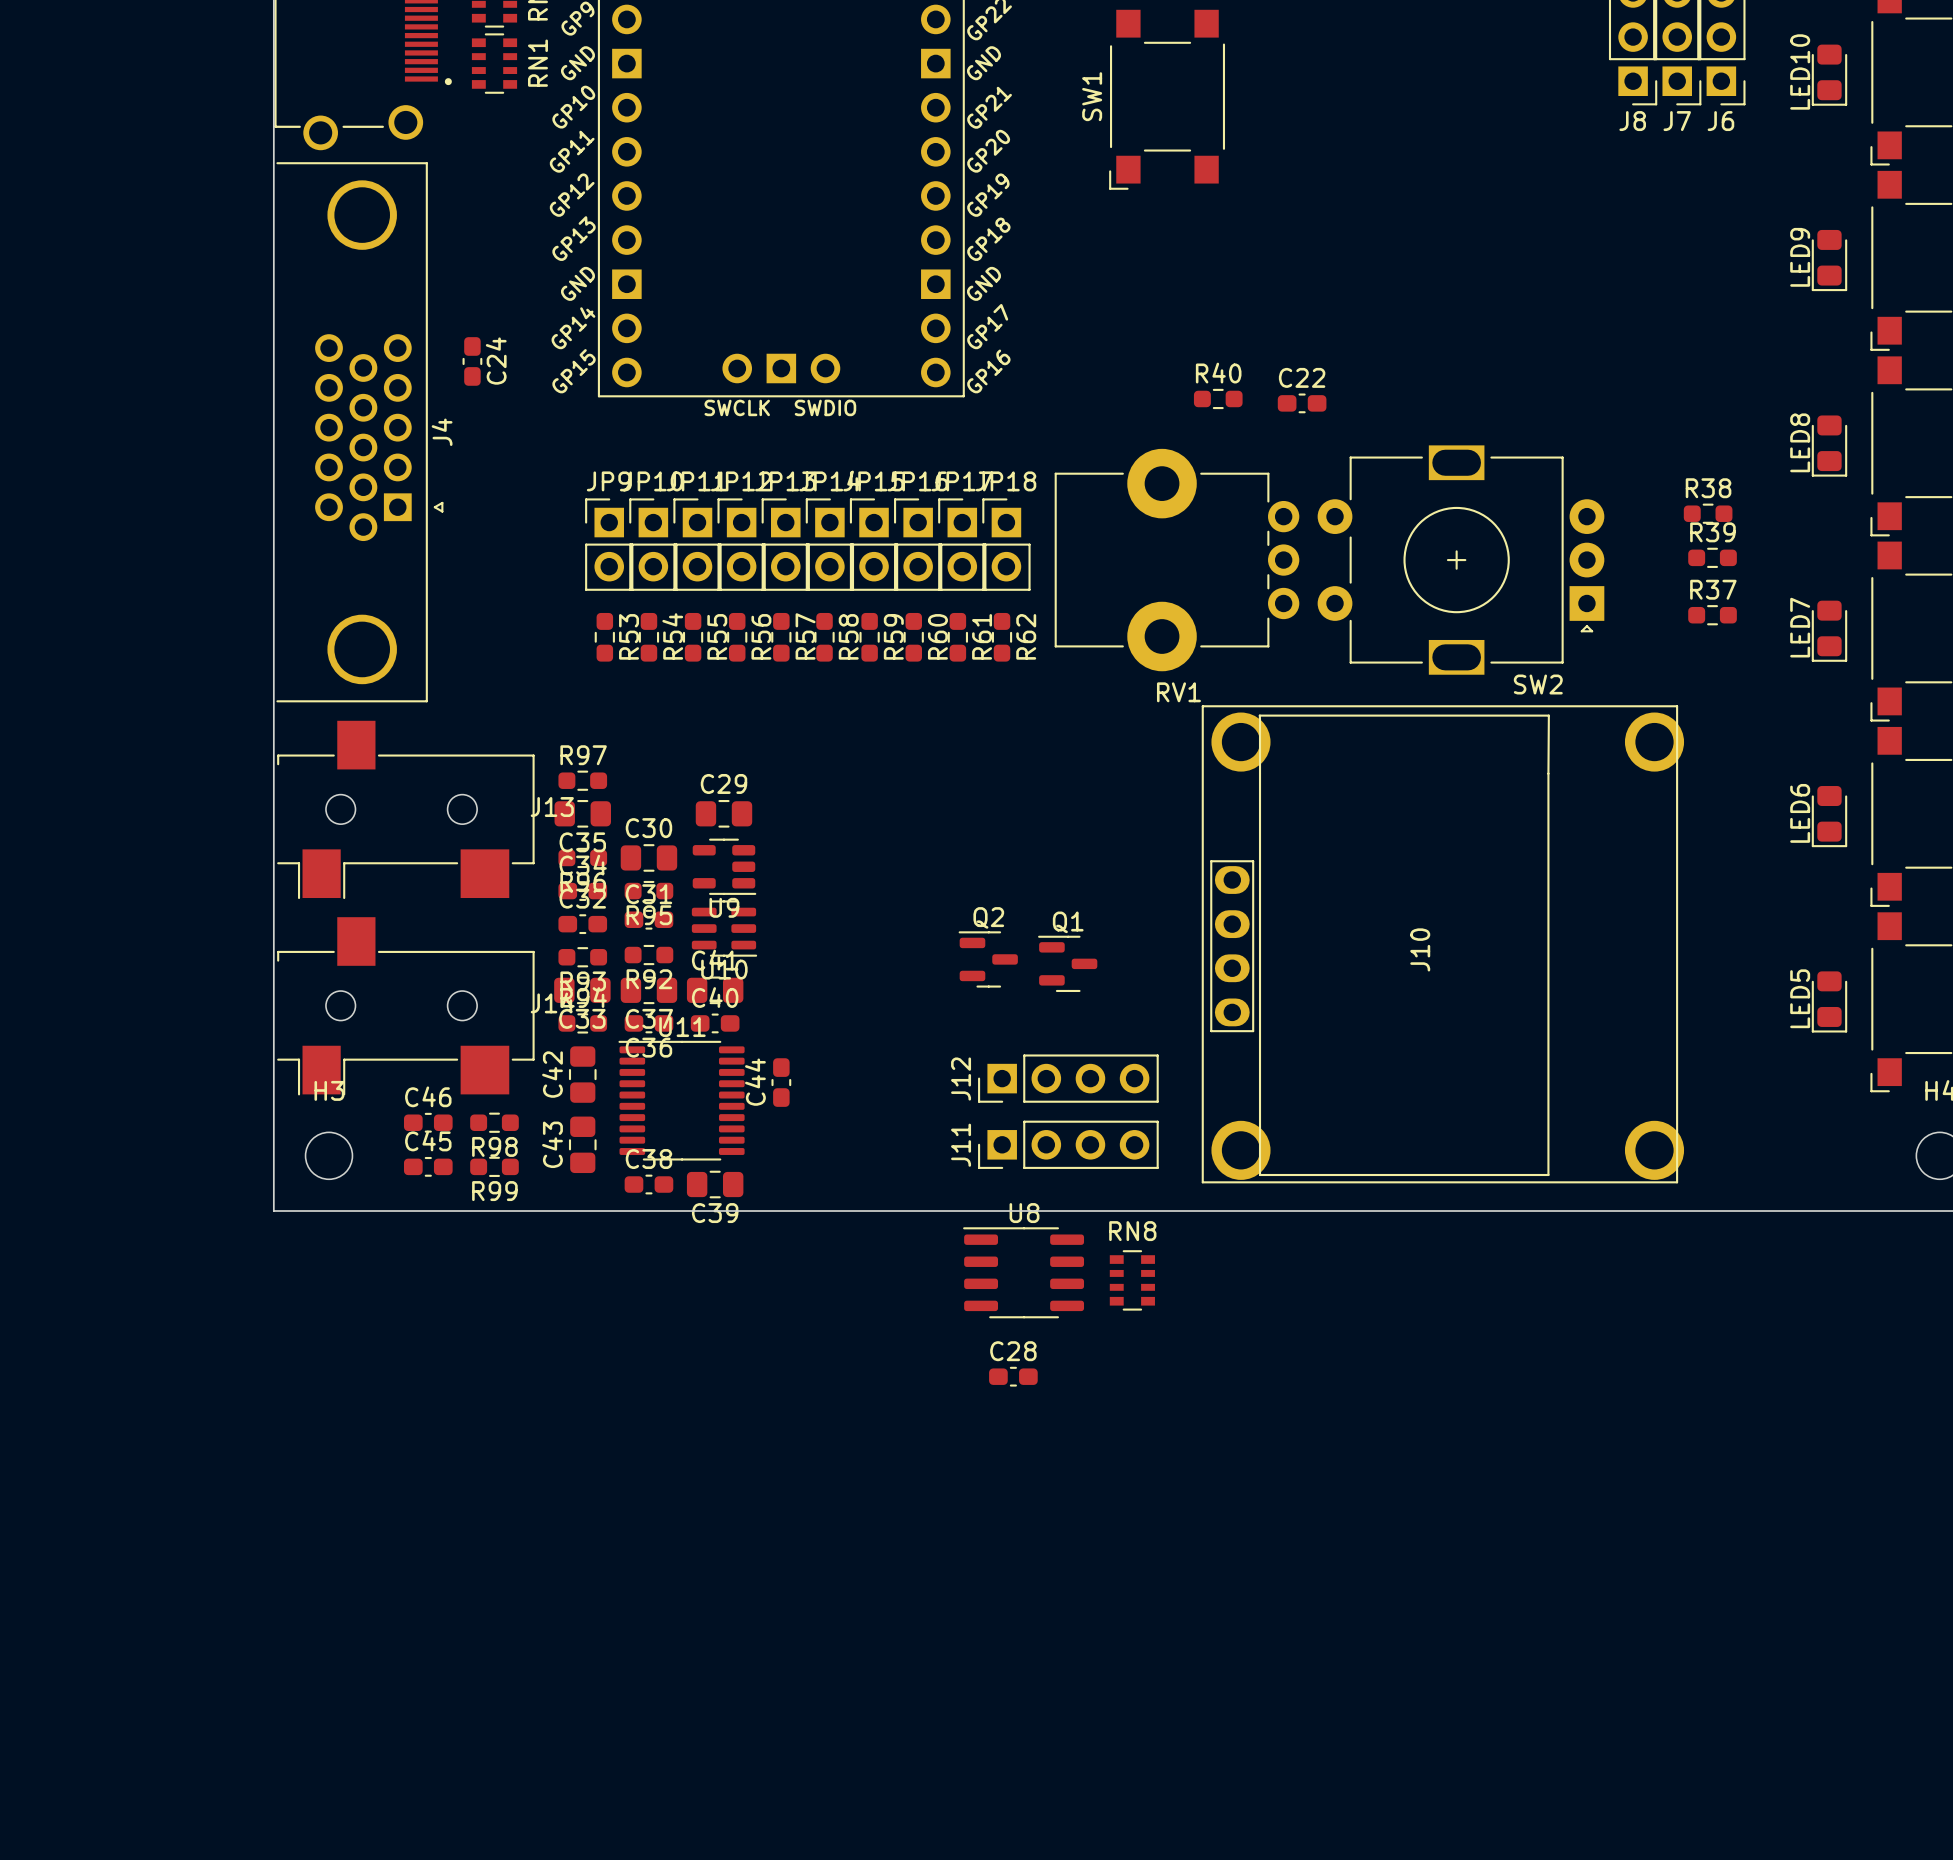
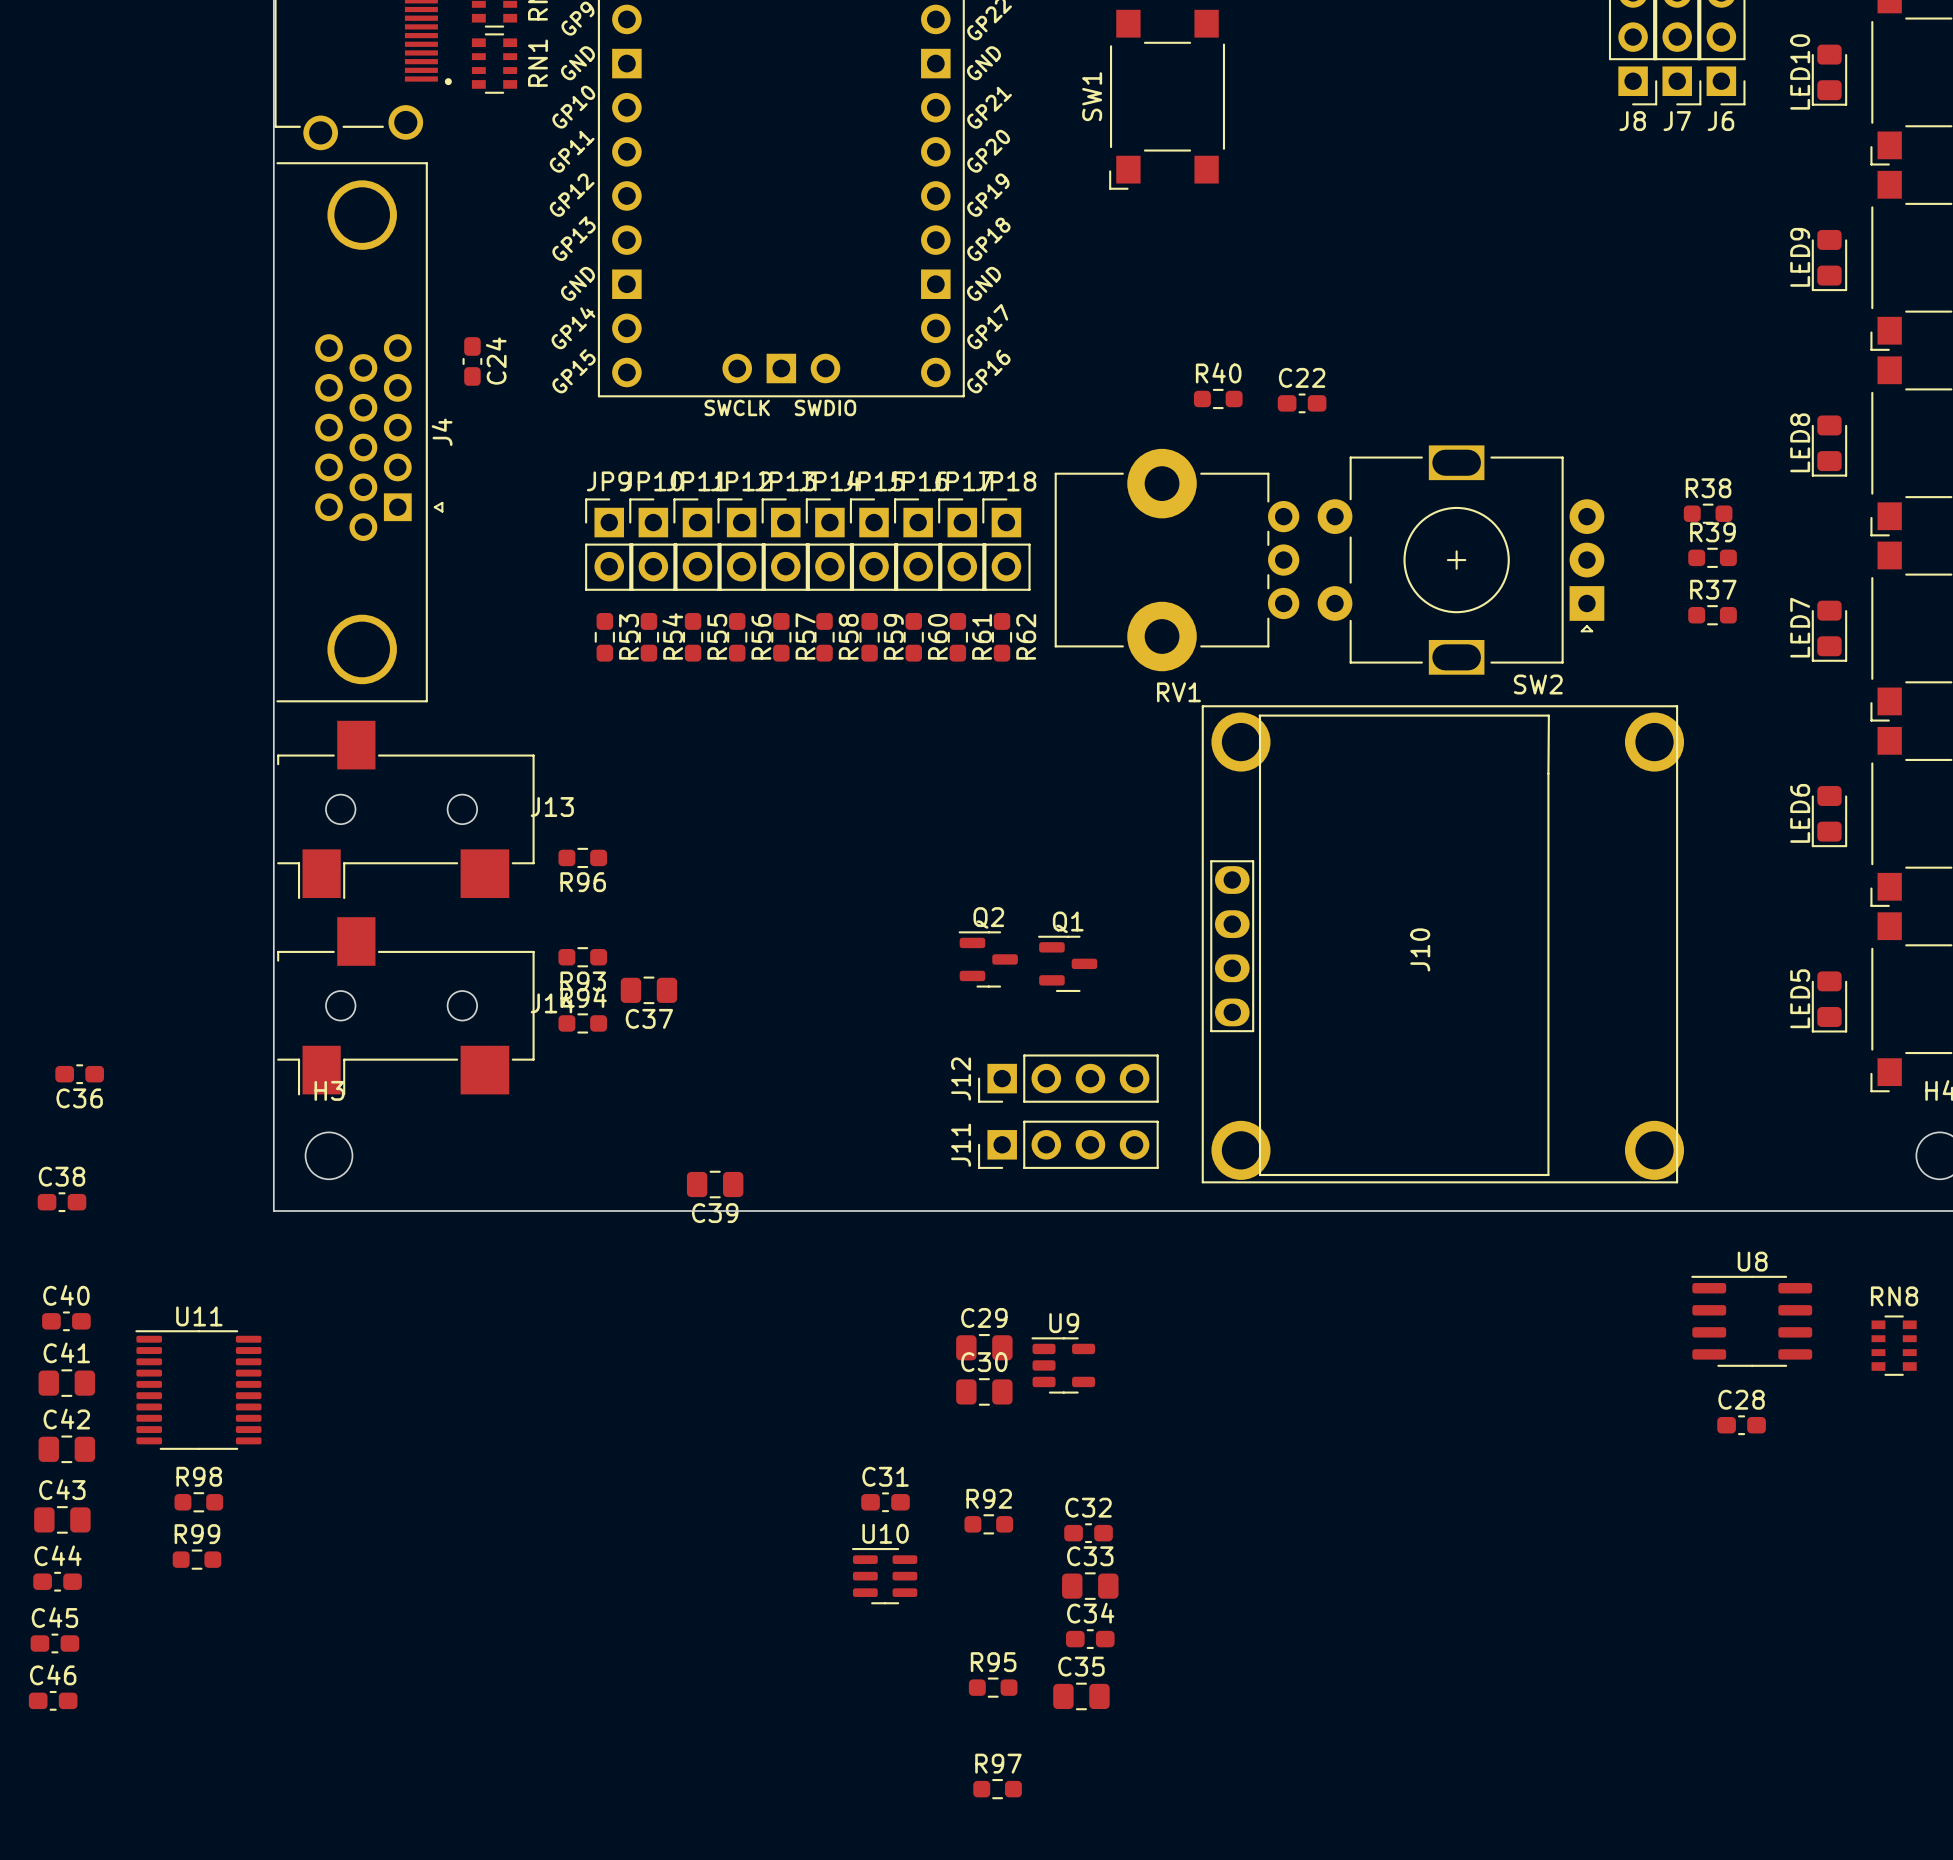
R97 position: (582, 780) -> (997, 1789)
C35 position: (582, 813) -> (1081, 1696)
C29 position: (723, 813) -> (984, 1347)
C35 name position: C35 (582, 842) -> C35 (1081, 1666)
C30 position: (648, 857) -> (984, 1391)
U9 rotation: 0° (724, 866) -> 180° (1063, 1365)
U9 position: (724, 866) -> (1063, 1365)
C34 position: (582, 891) -> (1090, 1639)
R95 position: (648, 891) -> (993, 1687)
R95 name position: R95 (649, 915) -> R95 (993, 1662)
C31 position: (648, 919) -> (885, 1502)
C32 position: (582, 924) -> (1088, 1533)
U10 rotation: 0° (724, 928) -> 180° (884, 1576)
U10 position: (724, 928) -> (884, 1576)
R92 position: (648, 955) -> (988, 1524)
R92 name position: R92 (649, 979) -> R92 (989, 1498)
C33 position: (582, 990) -> (1090, 1586)
C41 position: (715, 990) -> (66, 1383)
C33 name position: C33 (582, 1018) -> C33 (1090, 1556)
C36 position: (648, 1023) -> (79, 1074)
C40 position: (715, 1023) -> (66, 1321)
C42 rotation: 0° (582, 1074) -> 90° clockwise (66, 1449)
C42 position: (582, 1074) -> (66, 1449)
C44 rotation: 0° (781, 1082) -> 90° clockwise (57, 1581)
C44 position: (781, 1082) -> (57, 1581)
U11 position: (681, 1100) -> (198, 1390)
C46 position: (428, 1122) -> (53, 1700)
R98 position: (494, 1122) -> (198, 1502)
C43 rotation: 0° (582, 1144) -> 90° clockwise (62, 1519)
C43 position: (582, 1144) -> (62, 1519)
R98 name position: R98 (494, 1146) -> R98 (199, 1476)
C45 position: (428, 1166) -> (54, 1643)
R99 position: (494, 1166) -> (197, 1559)
C38 position: (648, 1184) -> (62, 1202)
R99 name position: R99 (494, 1191) -> R99 (197, 1534)
U8 position: (1023, 1272) -> (1751, 1321)
RN8 position: (1132, 1280) -> (1894, 1345)
C28 position: (1013, 1376) -> (1741, 1425)

